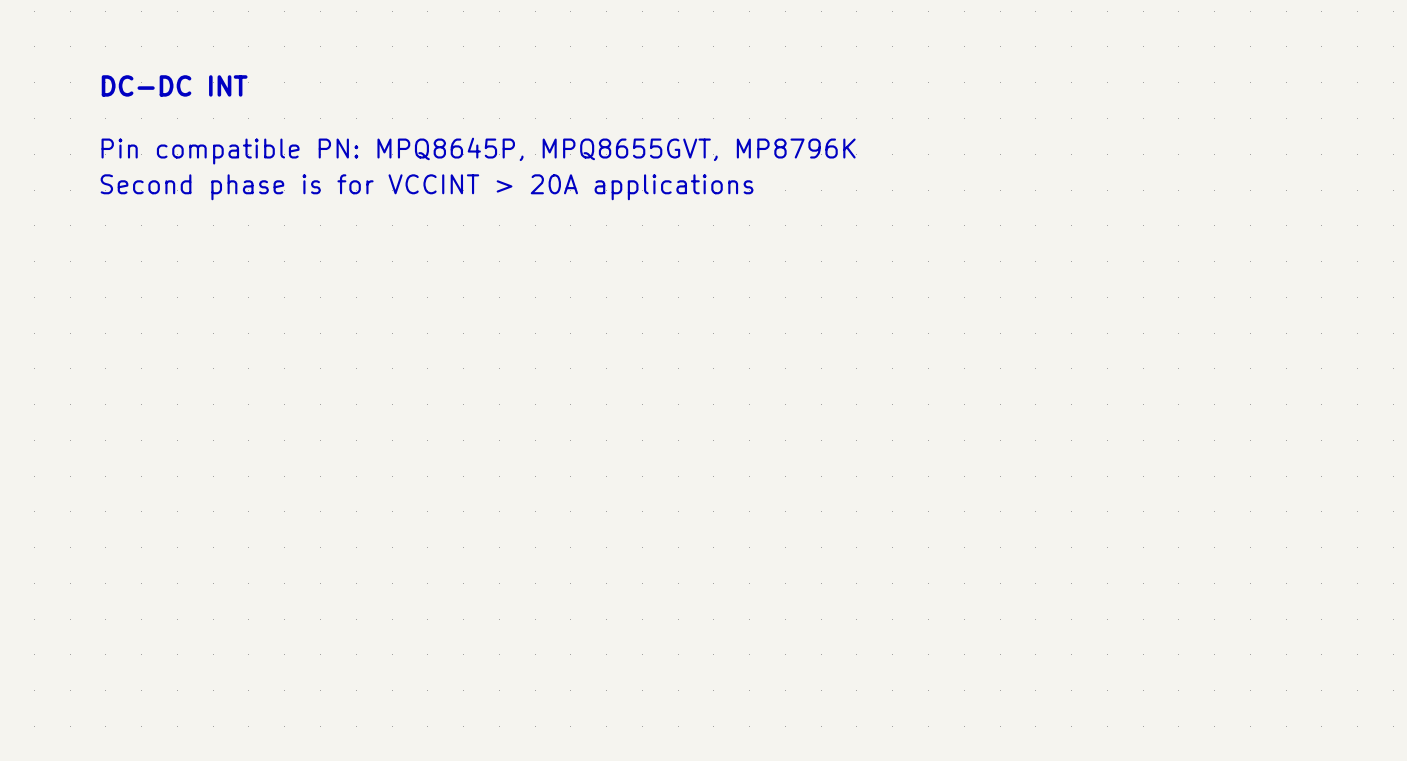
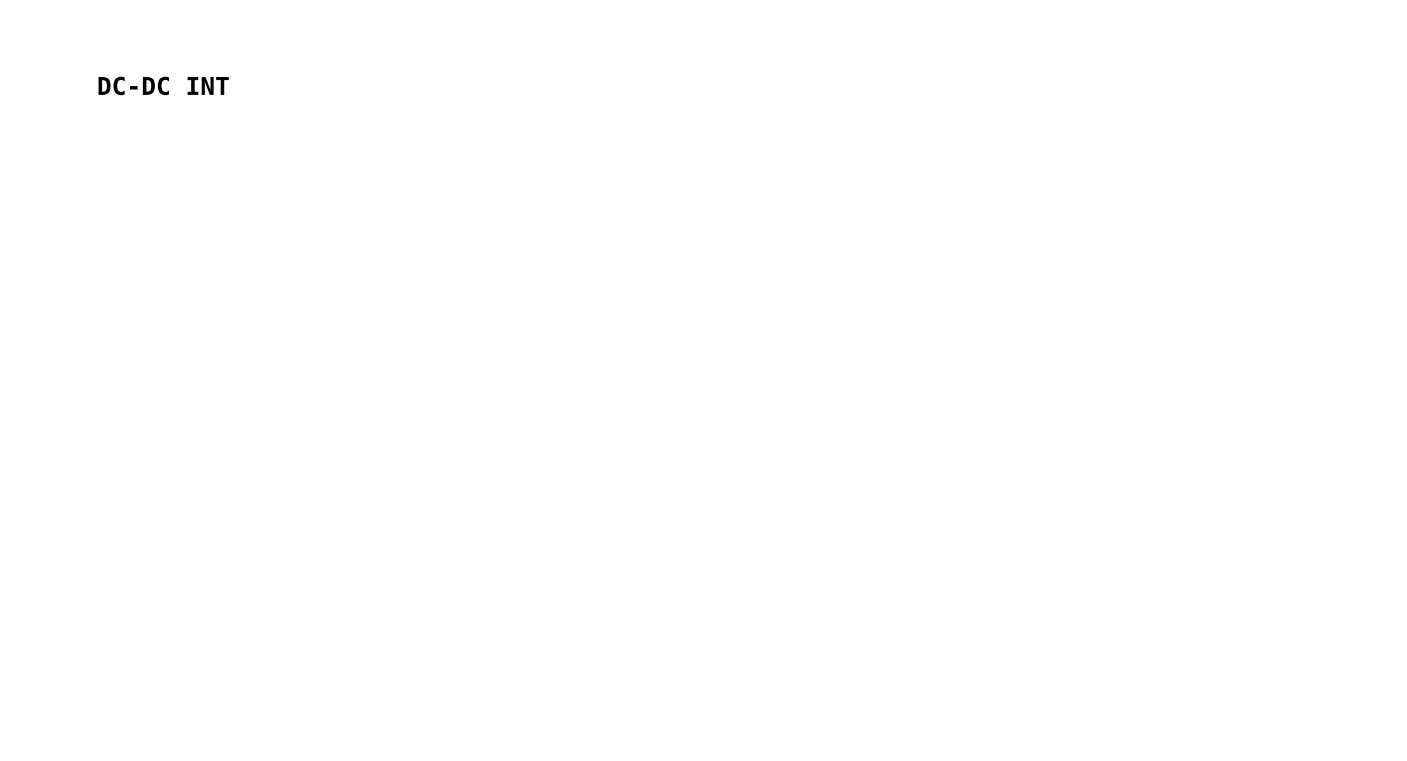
text: Pin compatible PN: MPQ8645P, MPQ8655GVT, MP8796K (478, 151) -> none
text: Second phase is for VCCINT > 20A applications (427, 187) -> none

